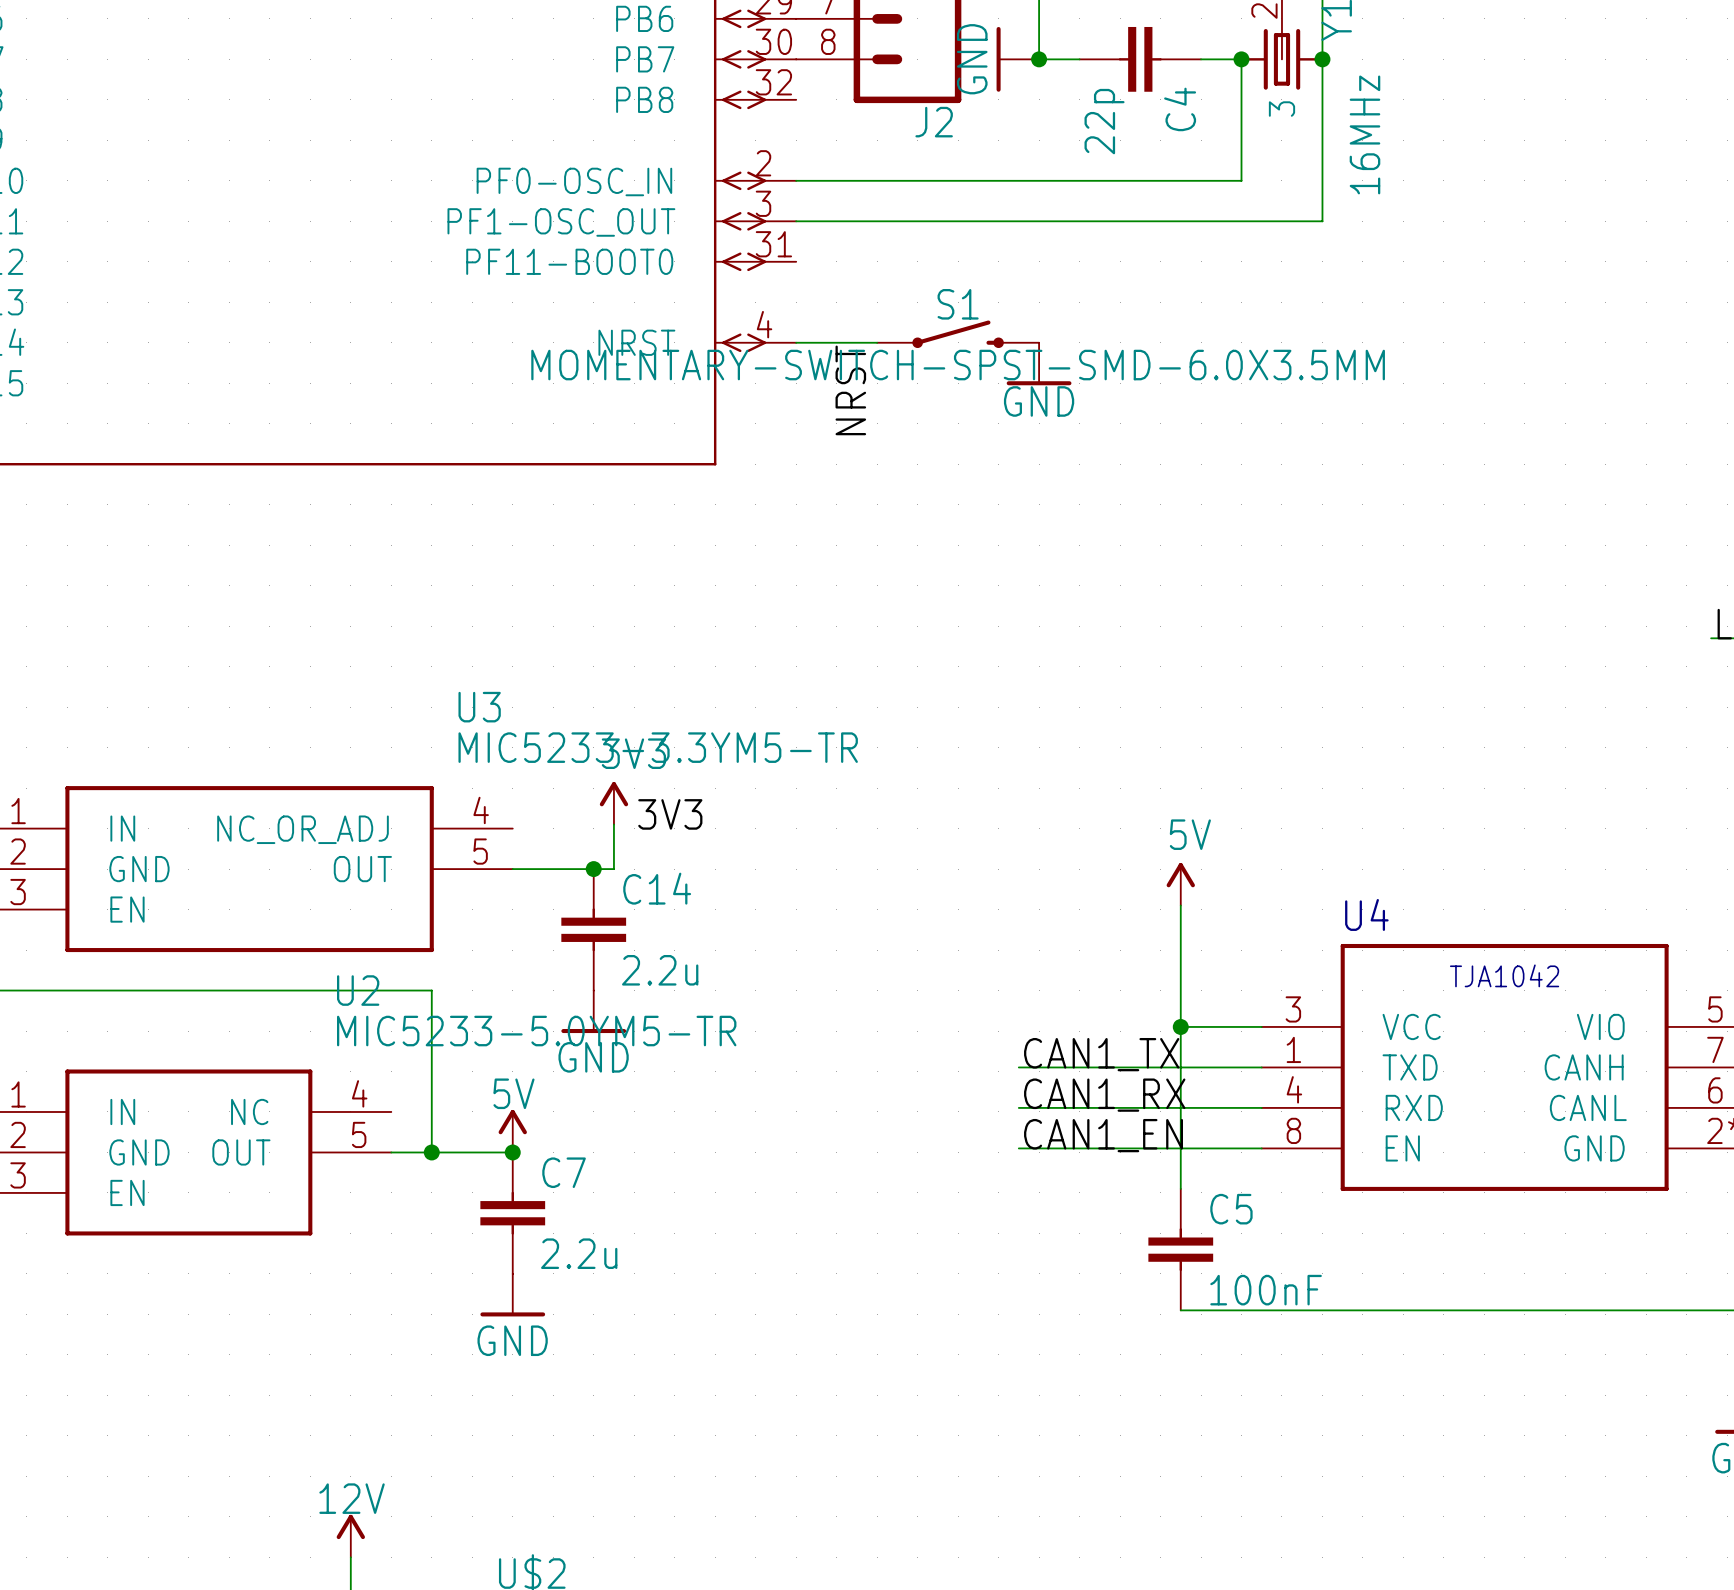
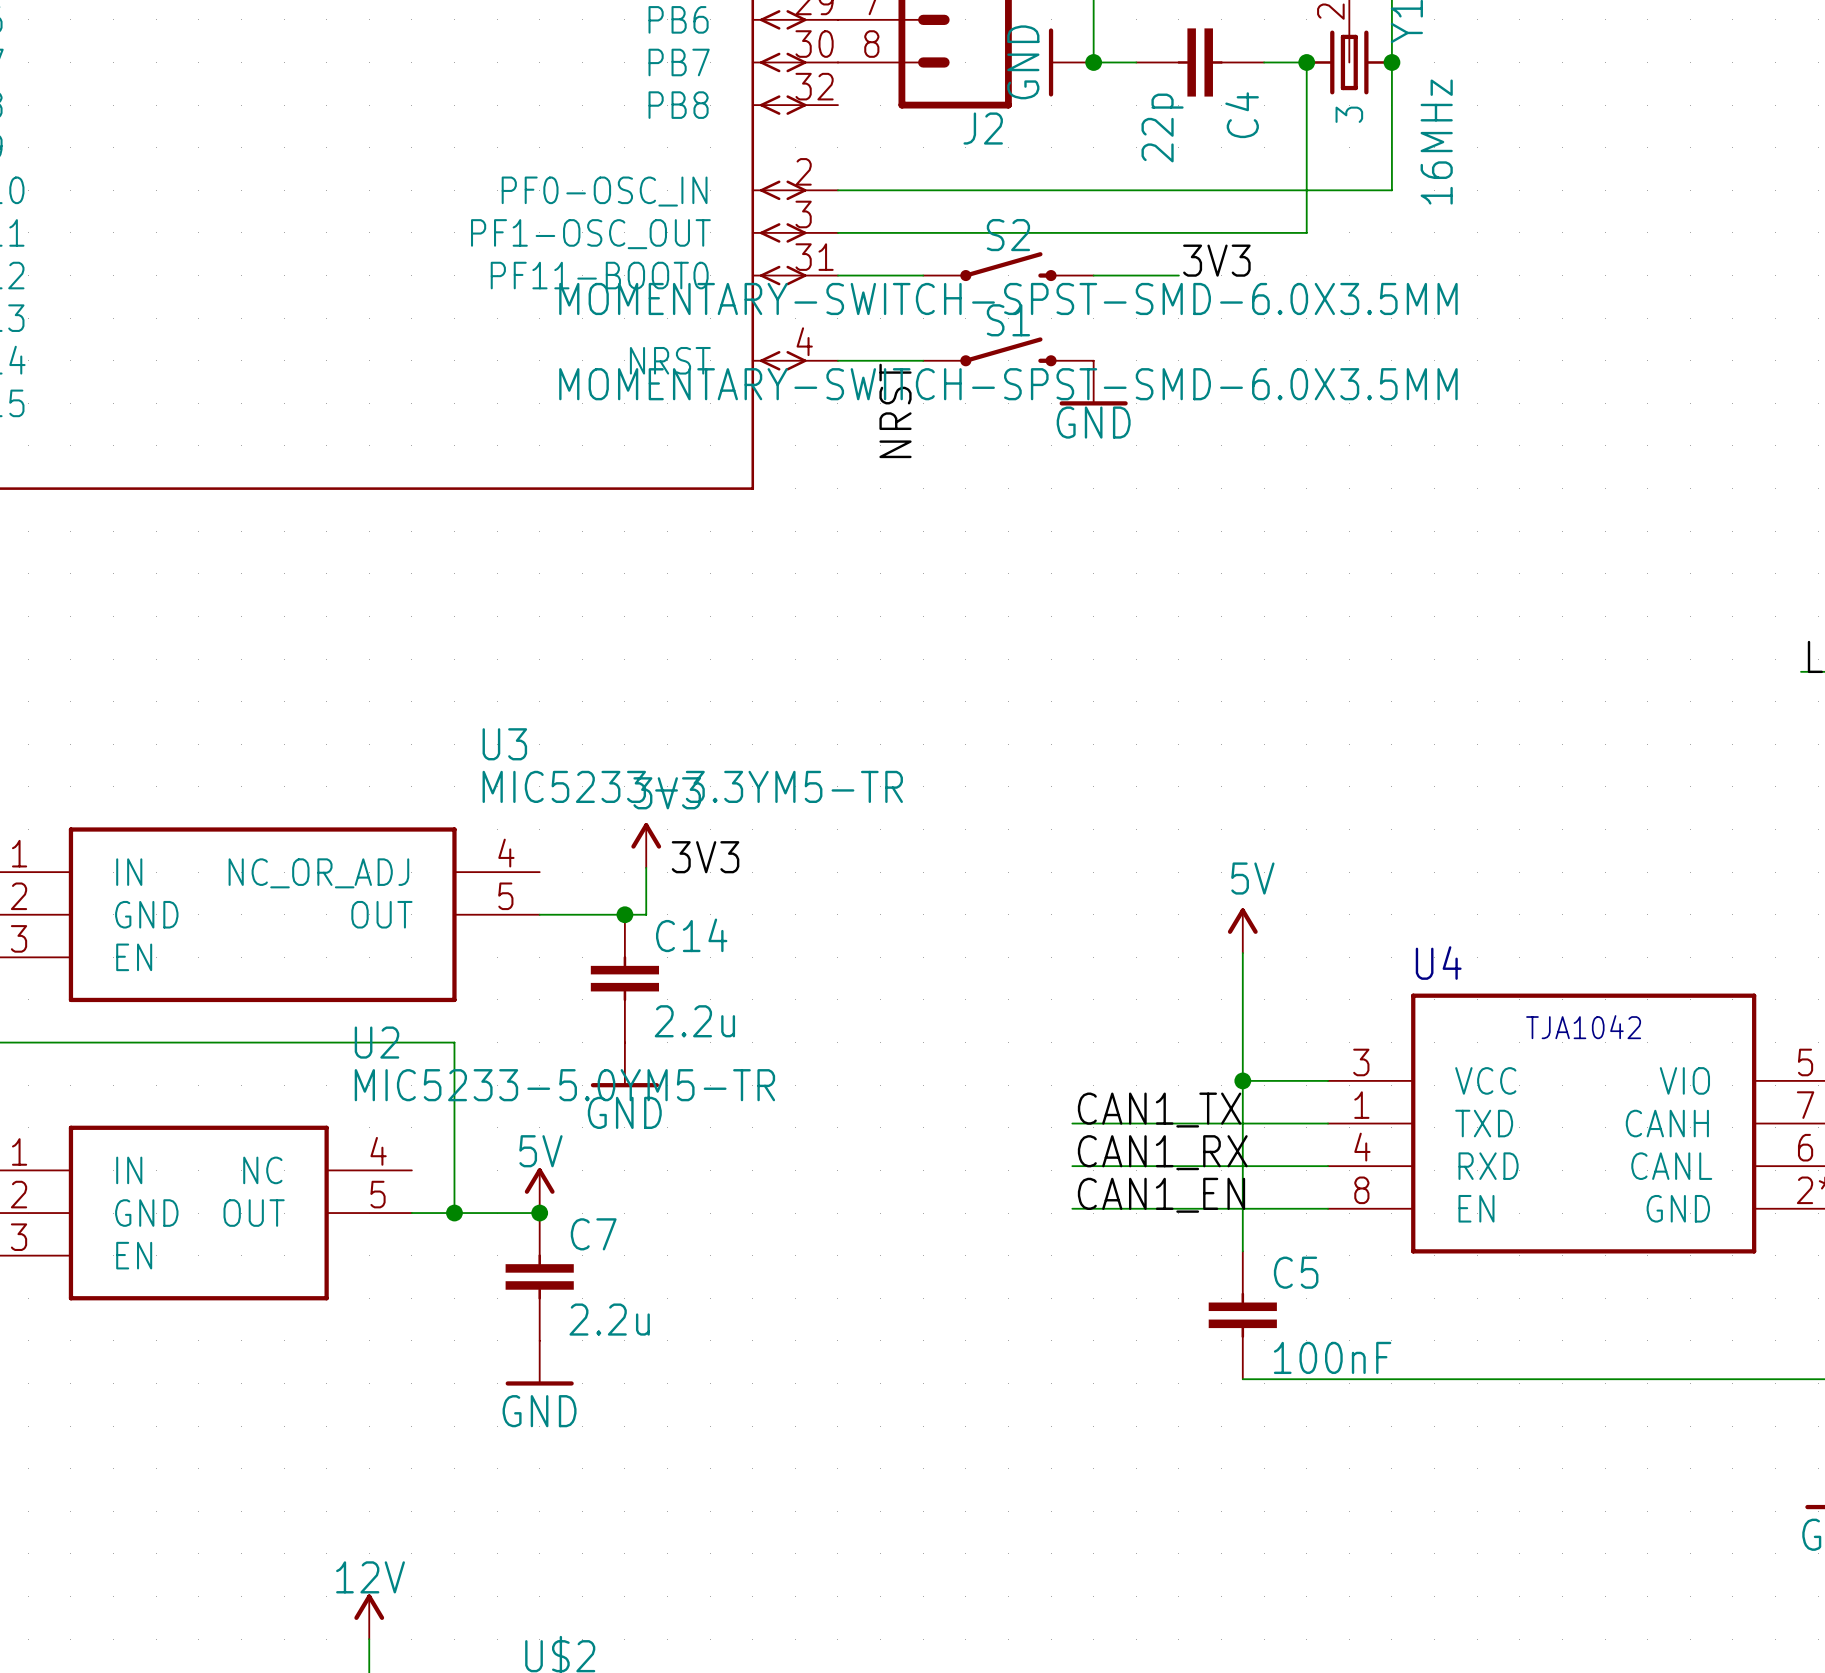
wire: (1322, 180) (1322, 221) (1241, 221) -> (1391, 190) (1306, 190) (1306, 232)
label: none -> 3V3 (1216, 260)
S2: none -> MOMENTARY-SWITCH-SPST-SMD-6.0X3.5MM (1008, 266)
wire: none -> (837, 275) (923, 275)
wire: none -> (1093, 275) (1178, 275)

